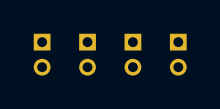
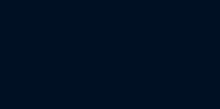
part: (42, 54) -> none
part: (87, 54) -> none
part: (132, 54) -> none
part: (178, 54) -> none

